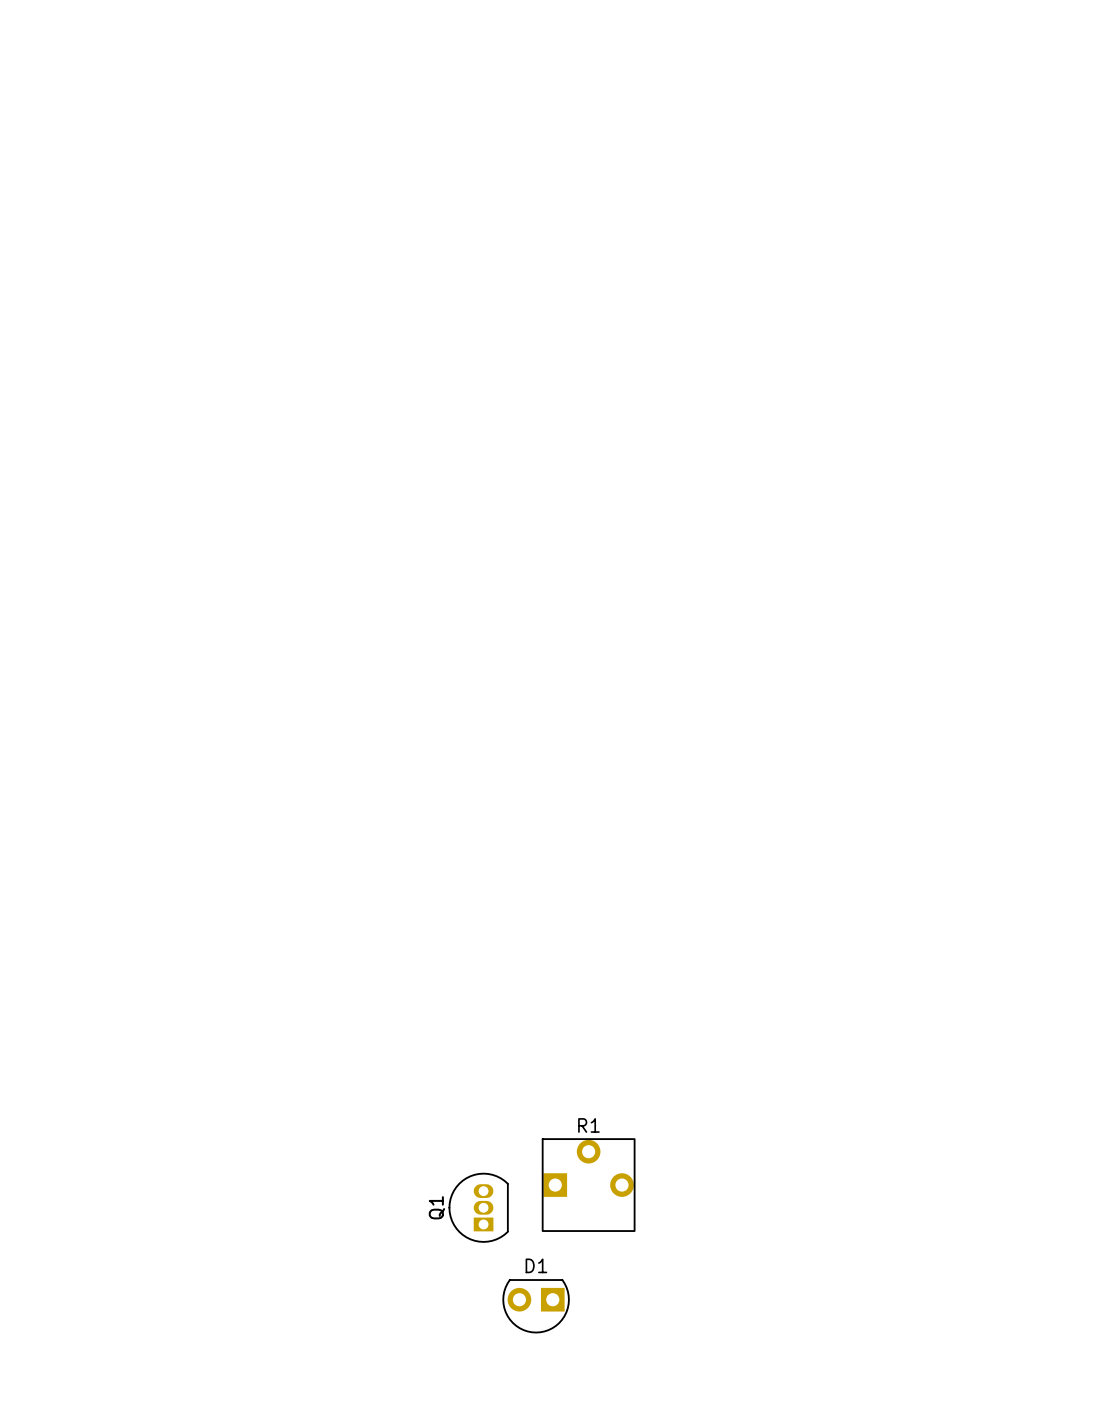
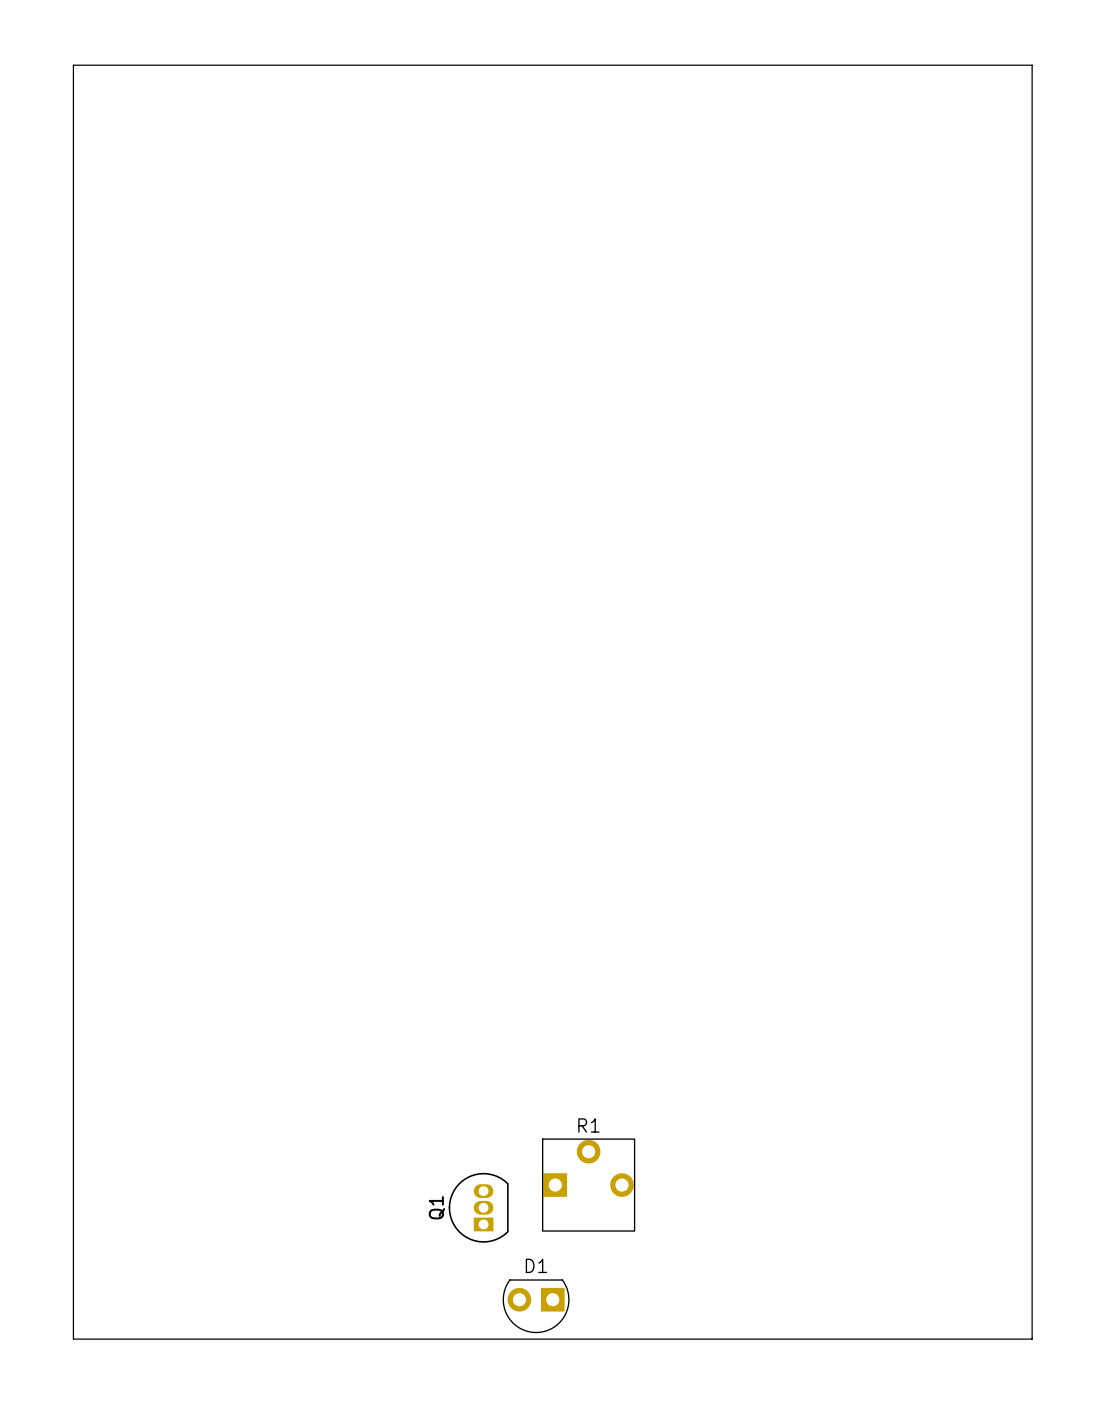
board edge: none -> (73, 65) (1032, 65) (1032, 1339) (73, 1339) (73, 65)

